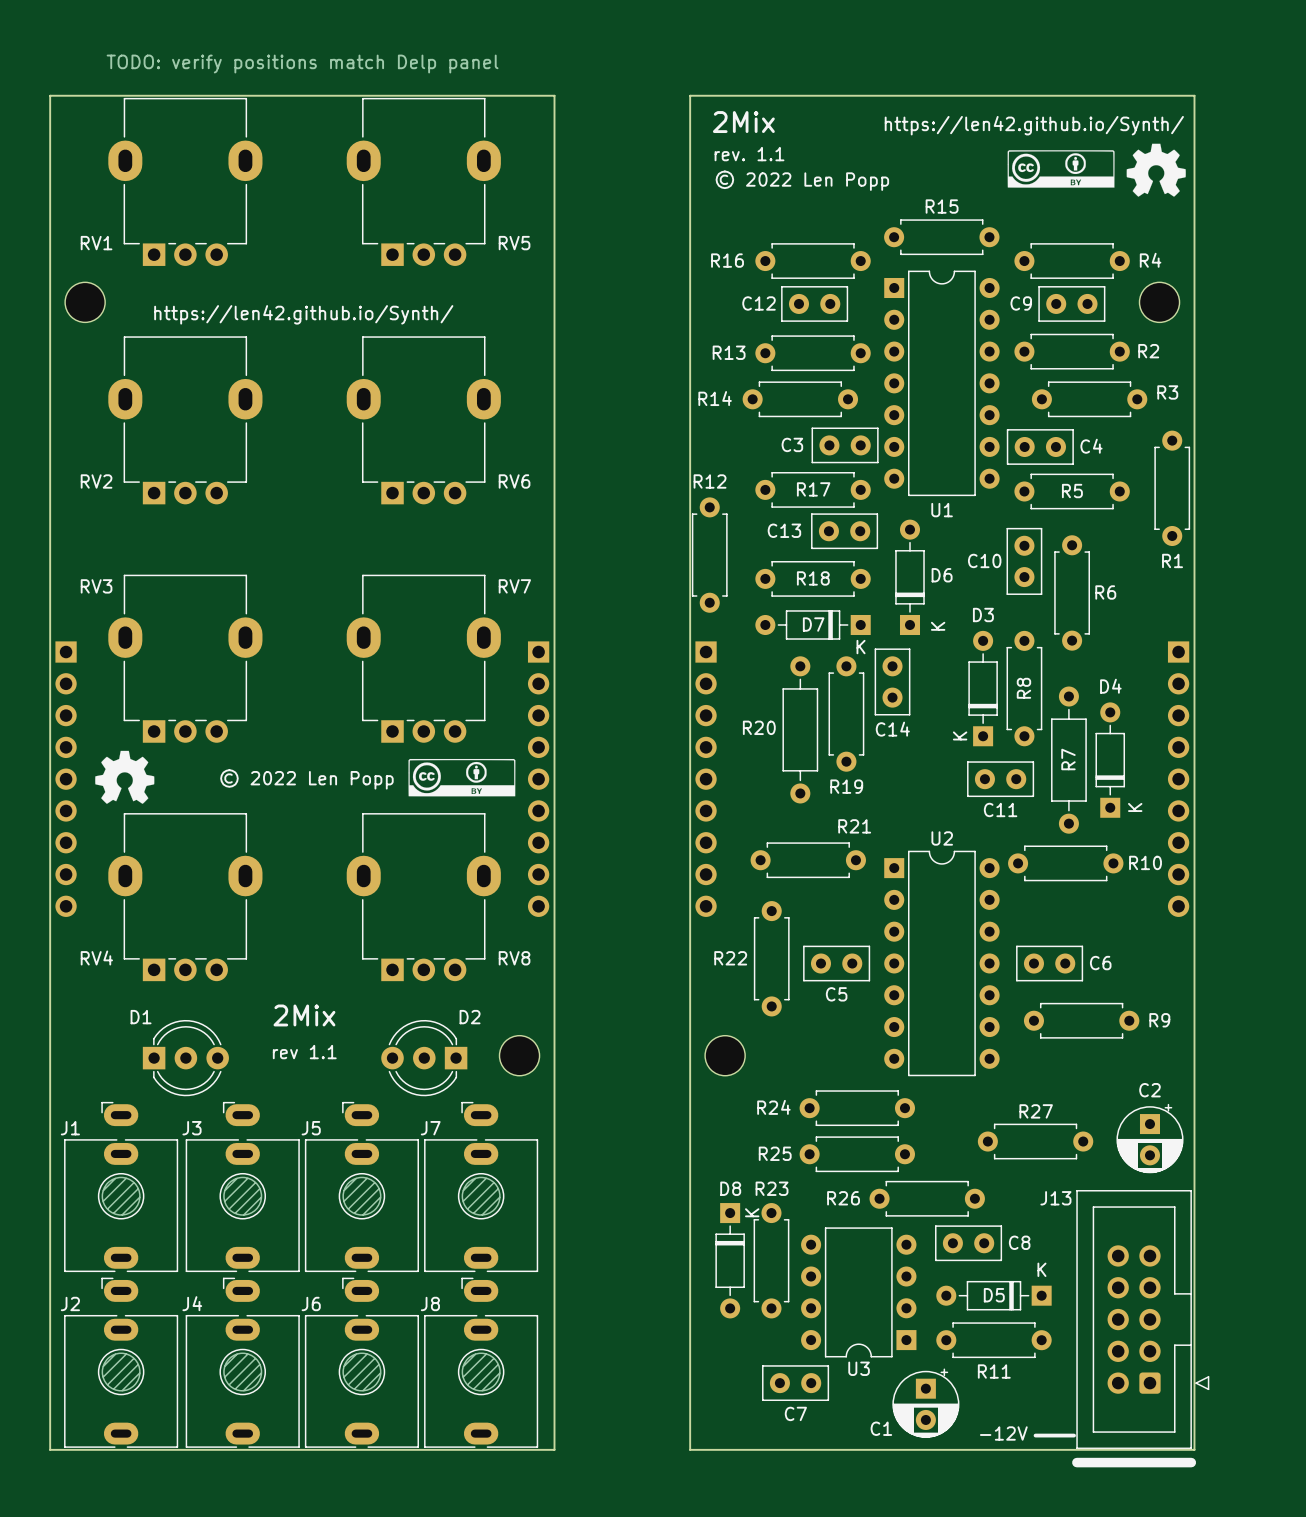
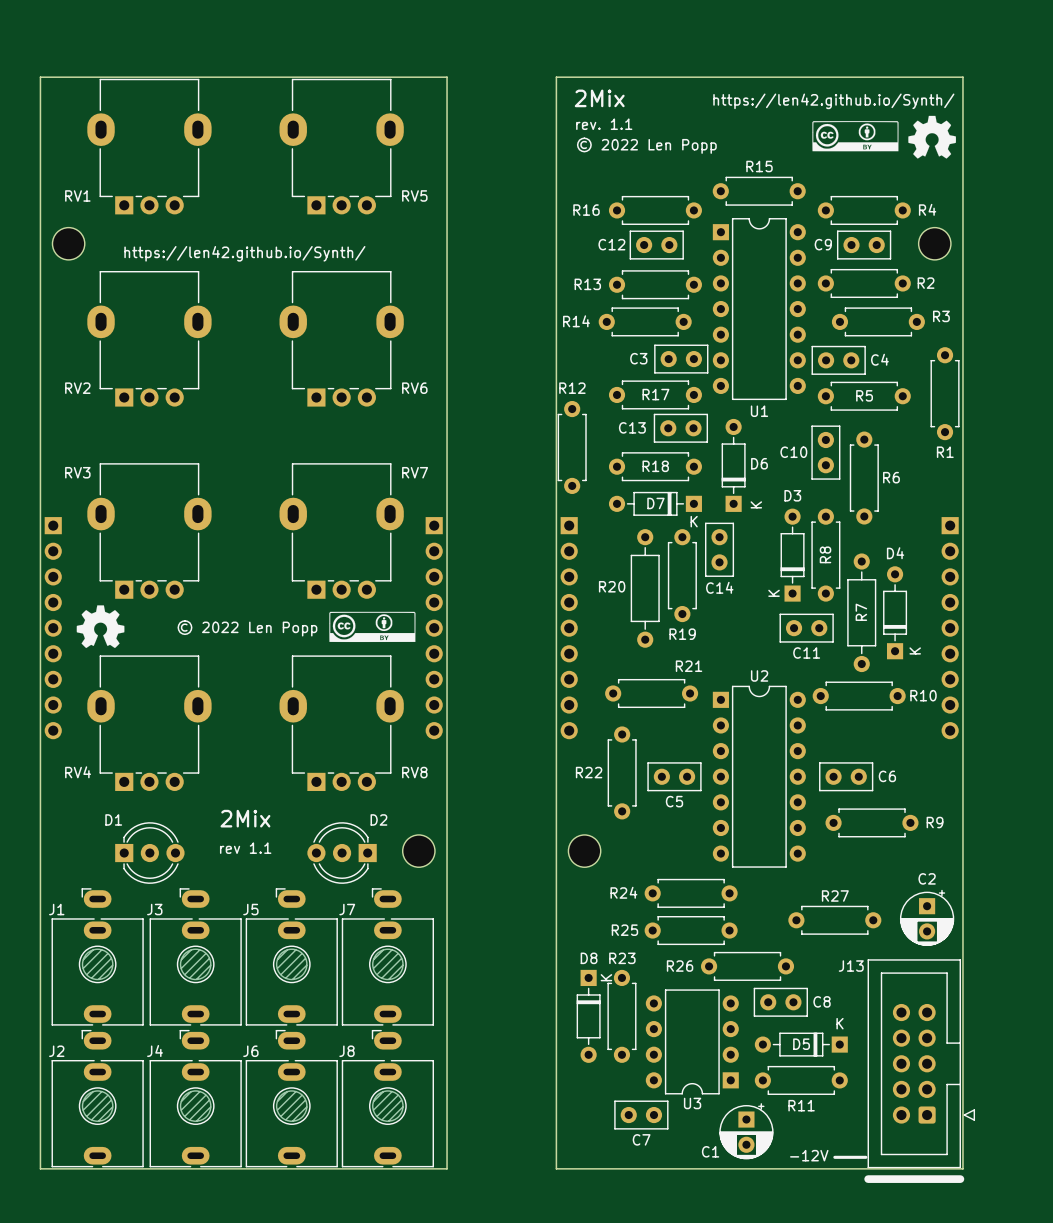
text: TODO: verify positions match Delp panel (302, 64) -> none

